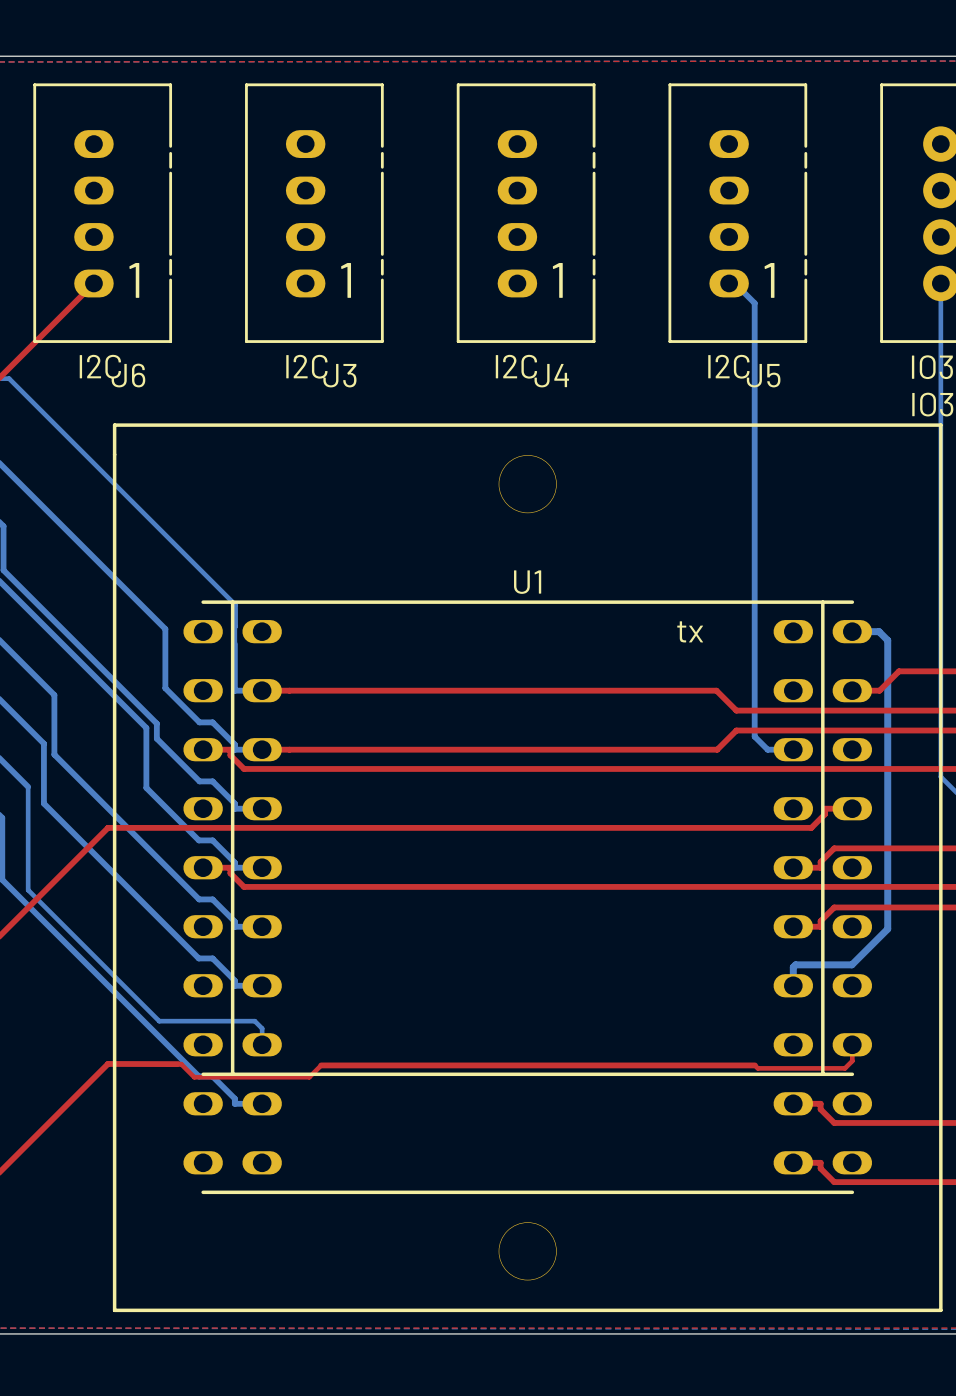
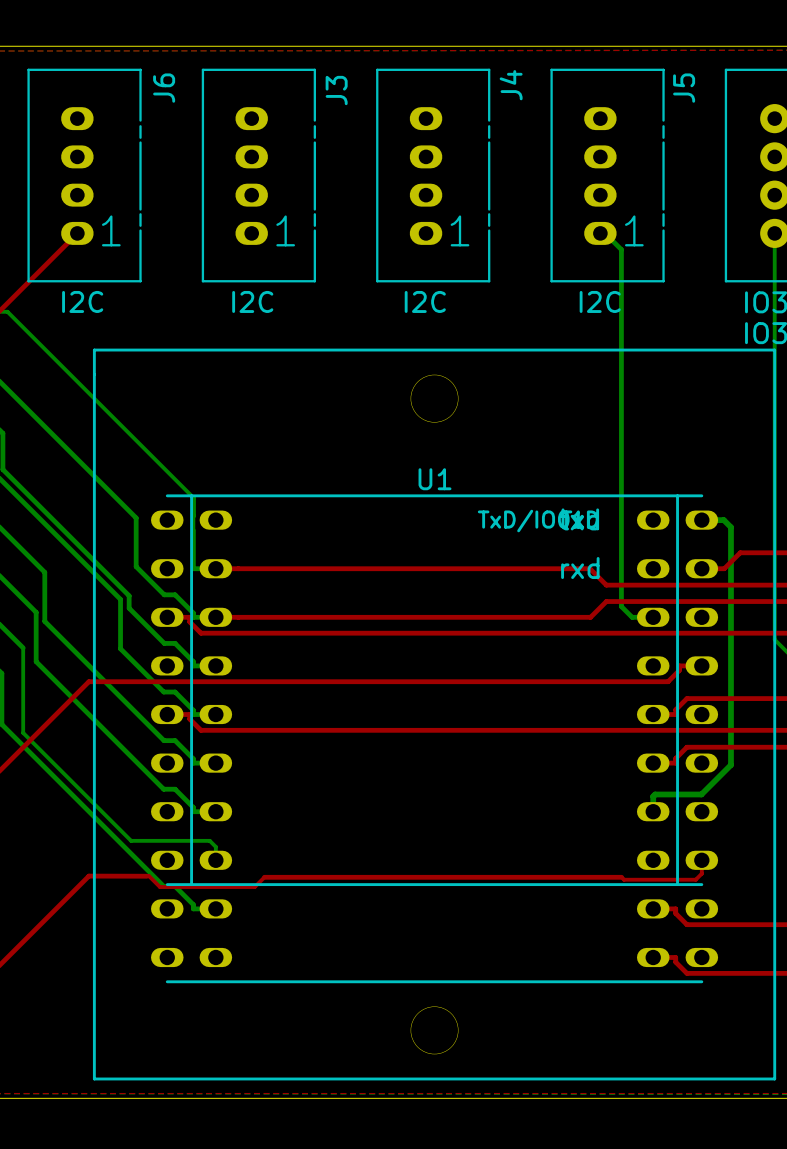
J6 name rotation: 0° (128, 375) -> 90° counterclockwise (164, 88)
J6 name position: J6 (128, 375) -> J6 (164, 88)
J3 name rotation: 0° (339, 375) -> 90° counterclockwise (336, 90)
J3 name position: J3 (339, 375) -> J3 (336, 90)
J4 name rotation: 0° (551, 375) -> 90° counterclockwise (511, 85)
J4 name position: J4 (551, 375) -> J4 (511, 85)
J5 name rotation: 0° (763, 375) -> 90° counterclockwise (684, 88)
J5 name position: J5 (763, 375) -> J5 (684, 88)
U1 footprint: [112, 423, 943, 1313] -> [92, 348, 777, 1081]

